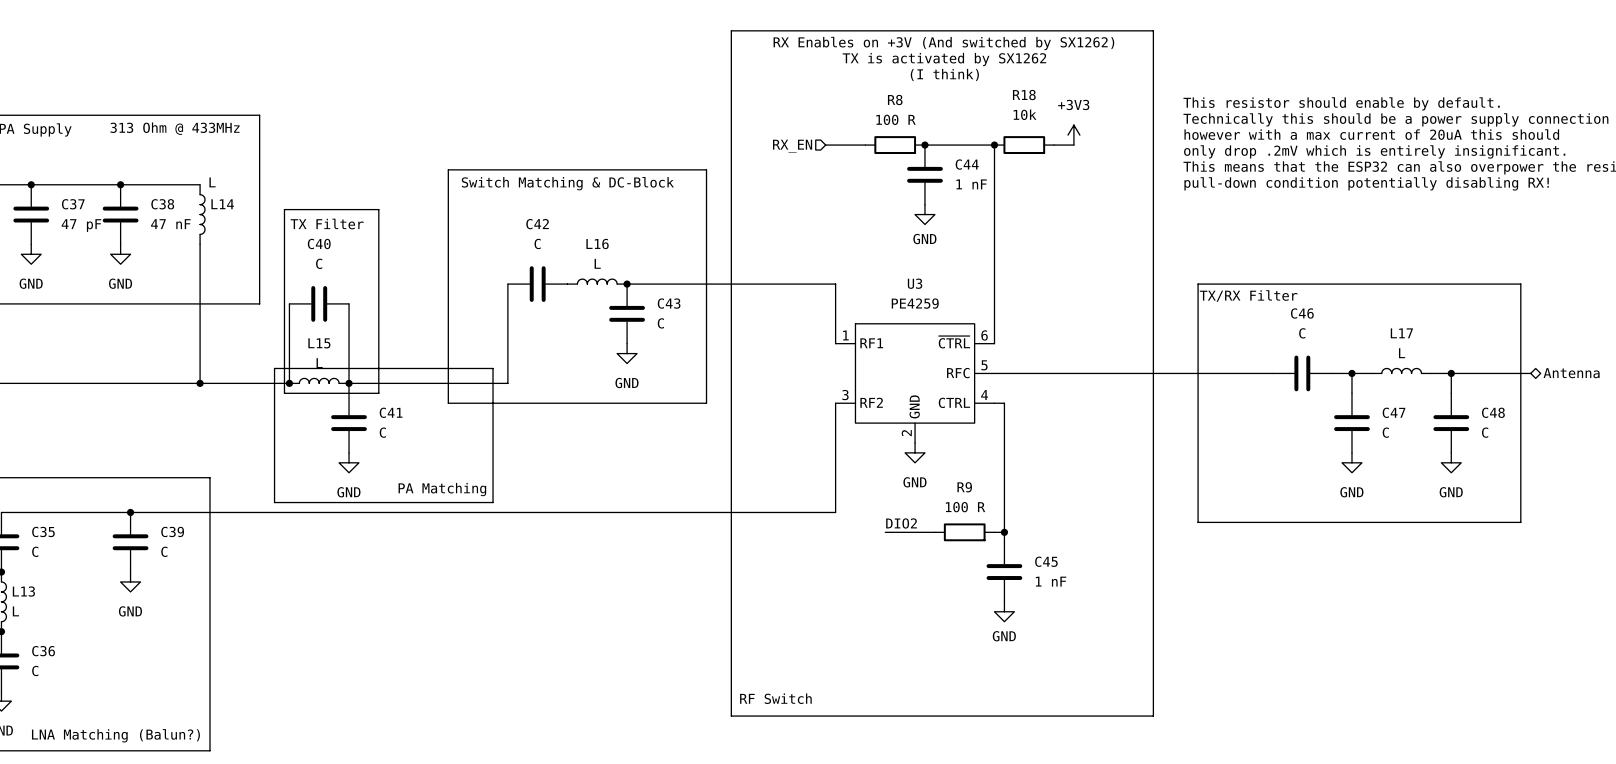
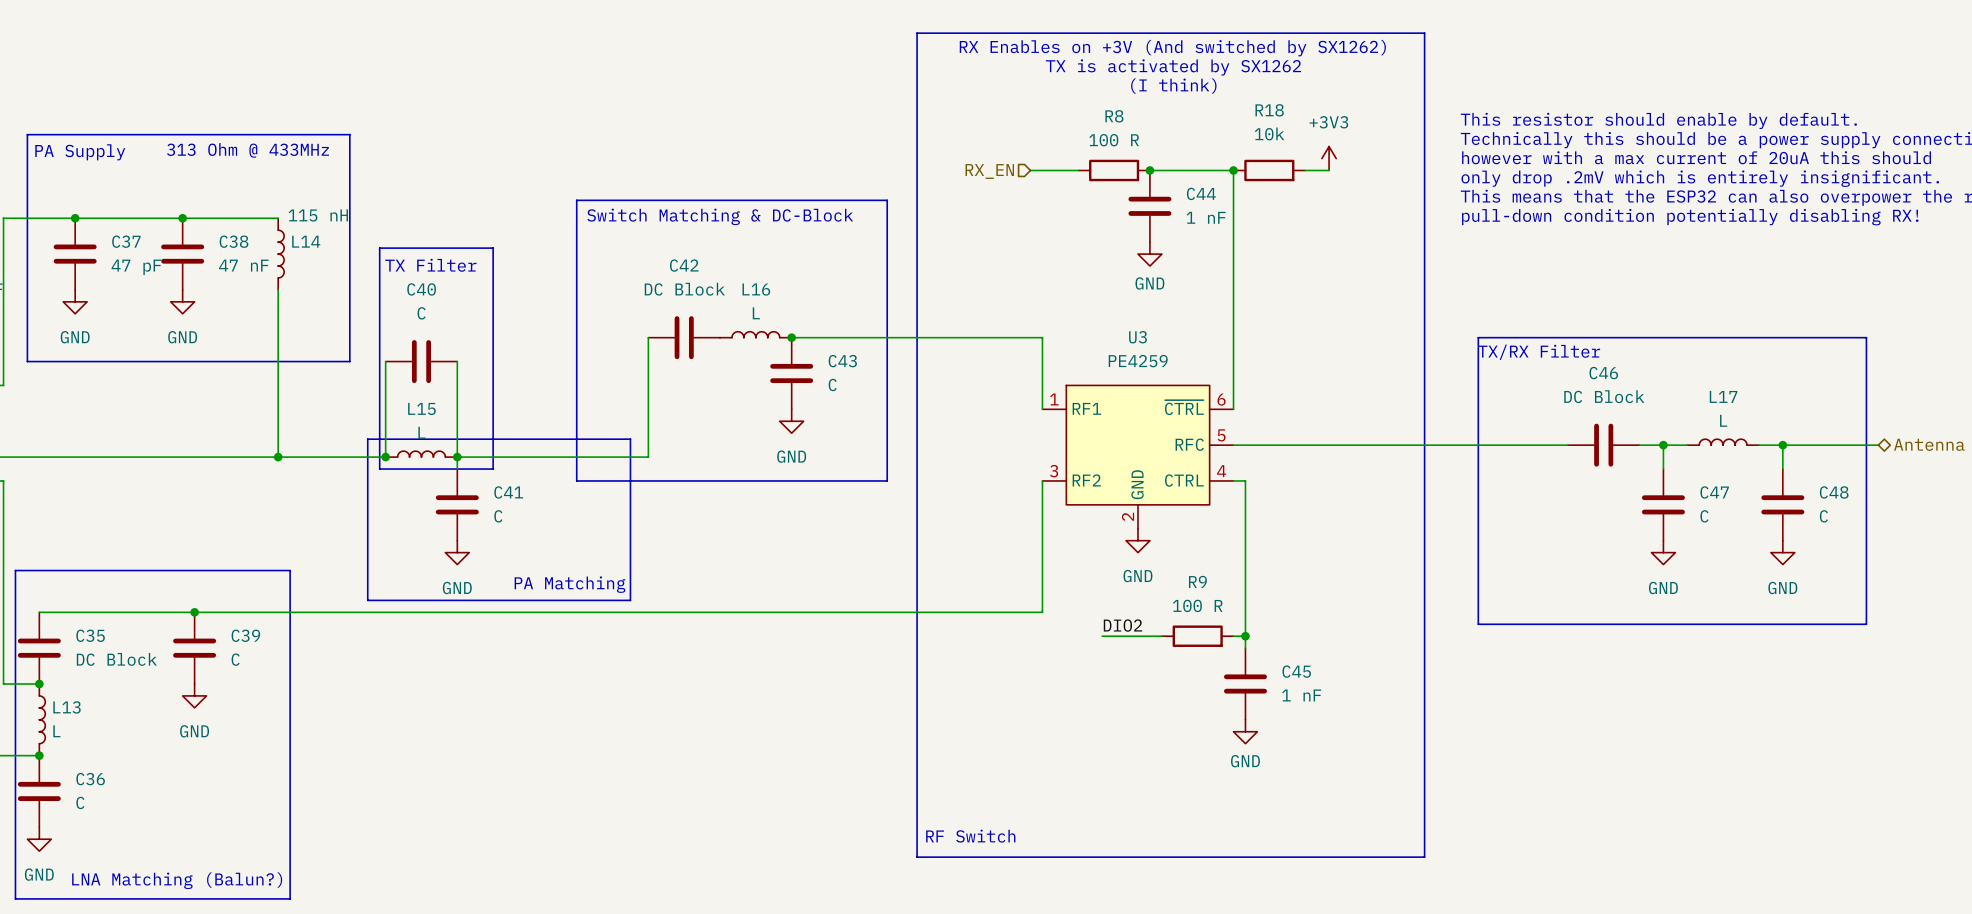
L14 value: L (212, 182) -> 115 nH (318, 215)
C42 value: C (537, 243) -> DC Block (684, 289)
C46 value: C (1302, 333) -> DC Block (1604, 396)
C35 value: C (35, 551) -> DC Block (116, 659)

